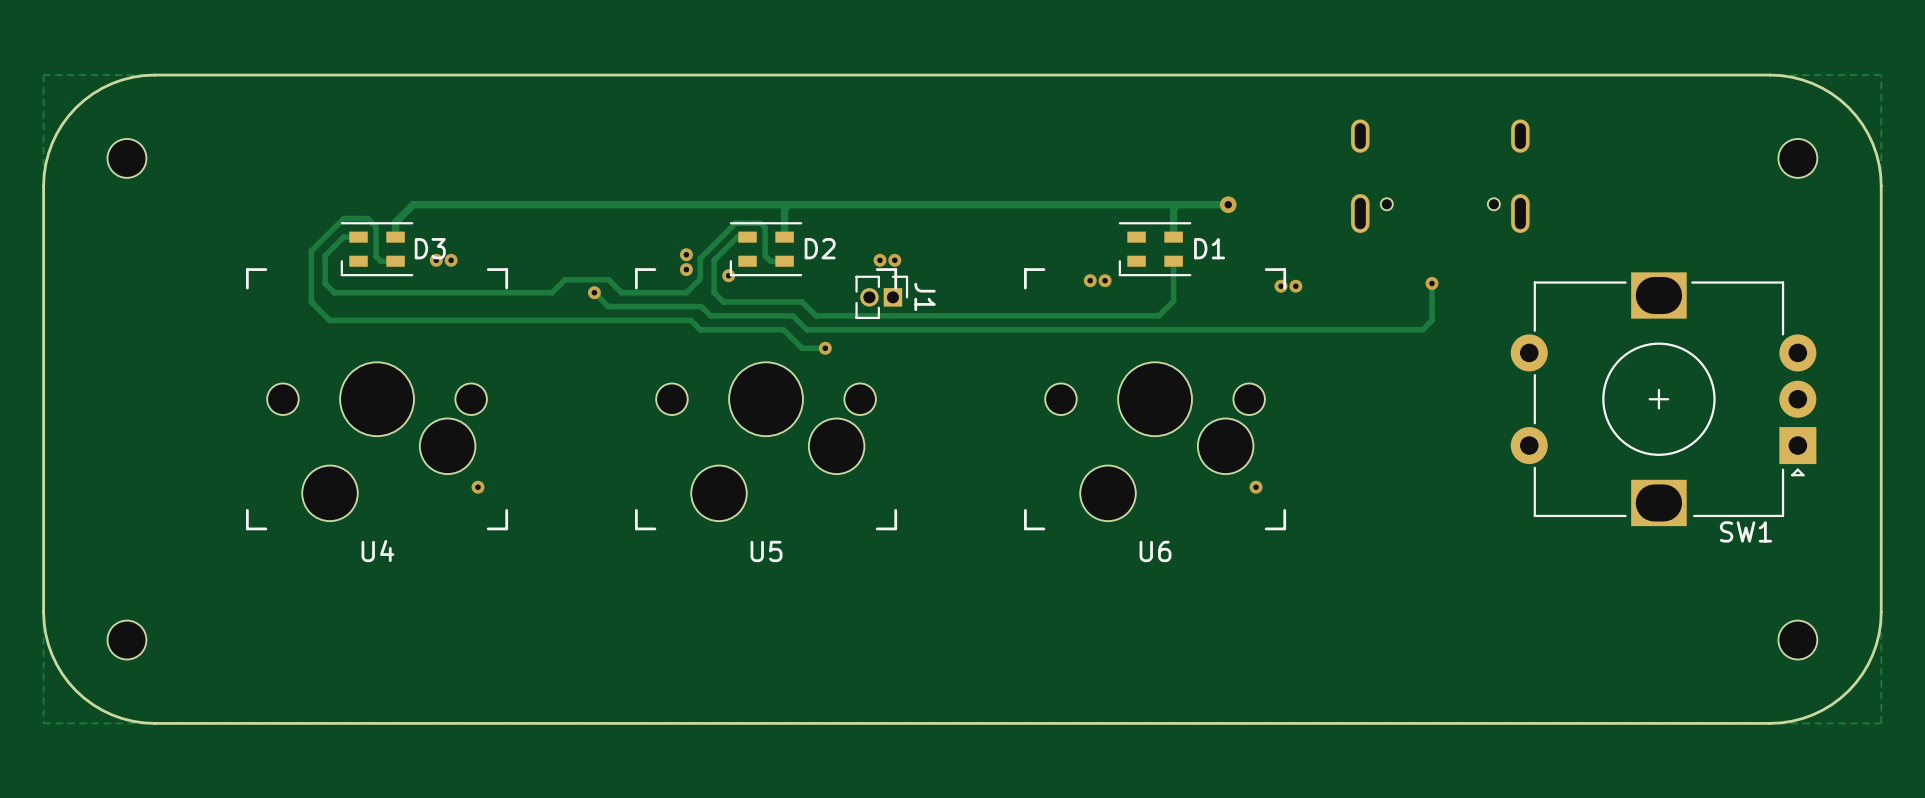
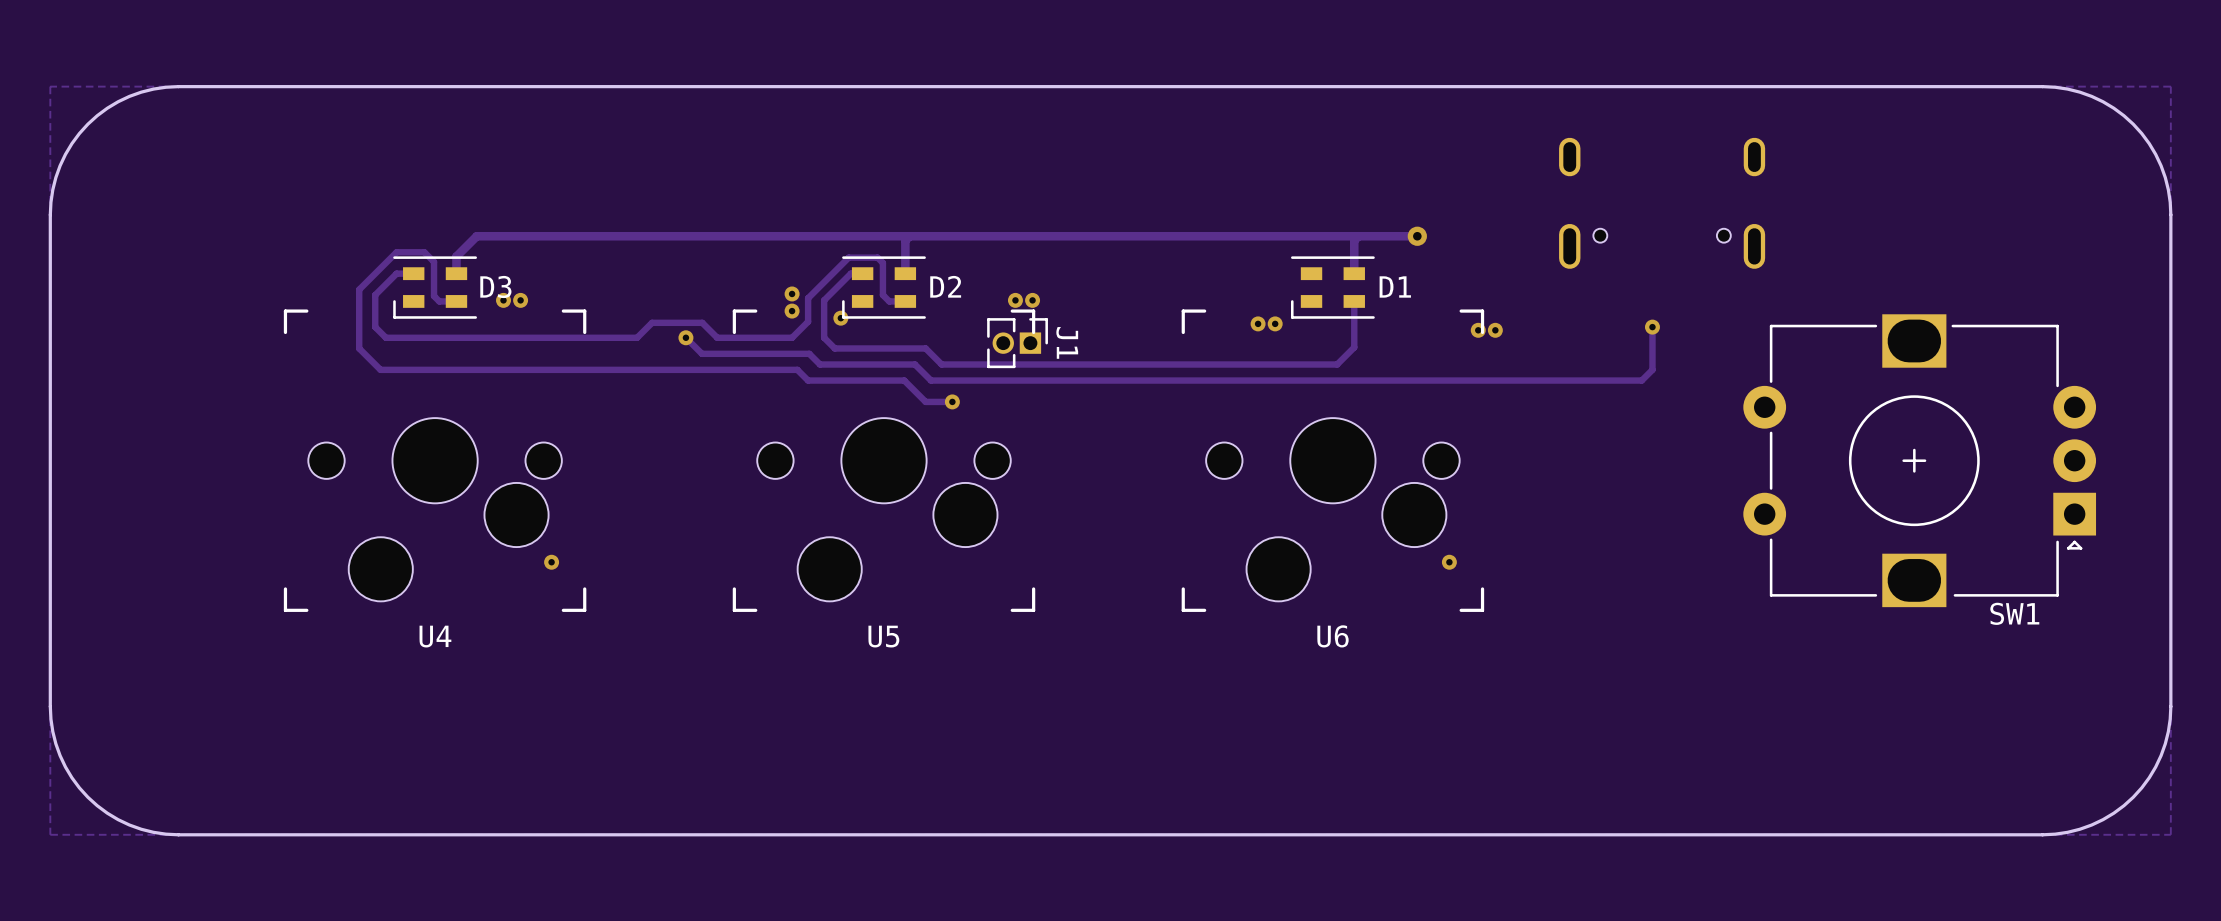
part: (126, 158) -> none
part: (1797, 158) -> none
part: (126, 640) -> none
part: (1797, 640) -> none

